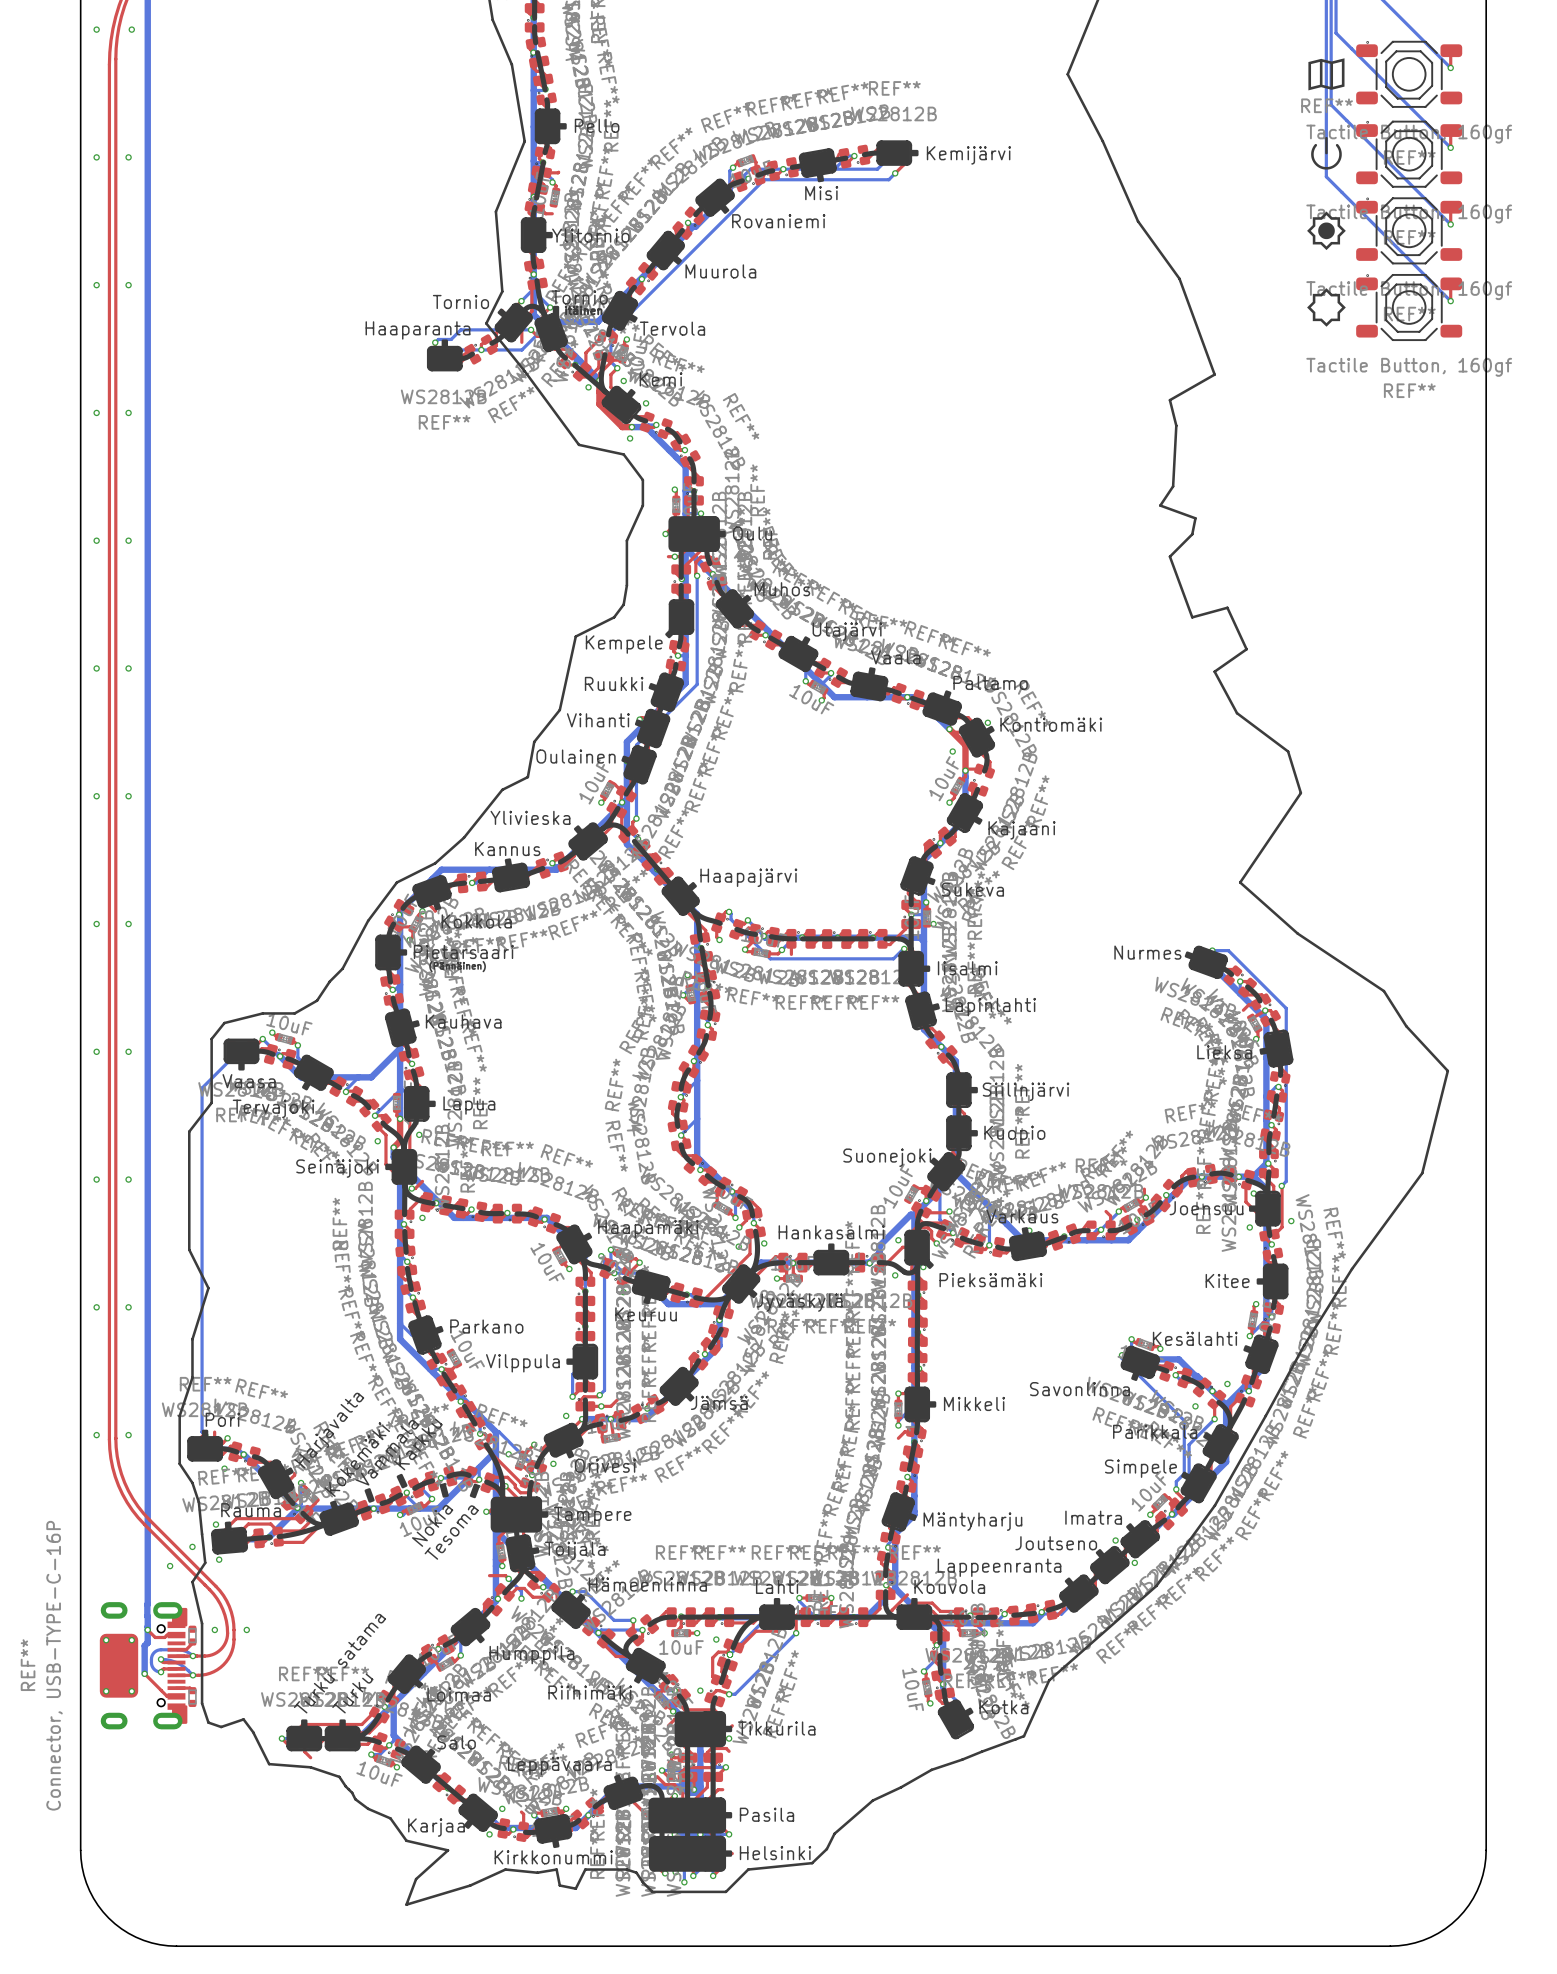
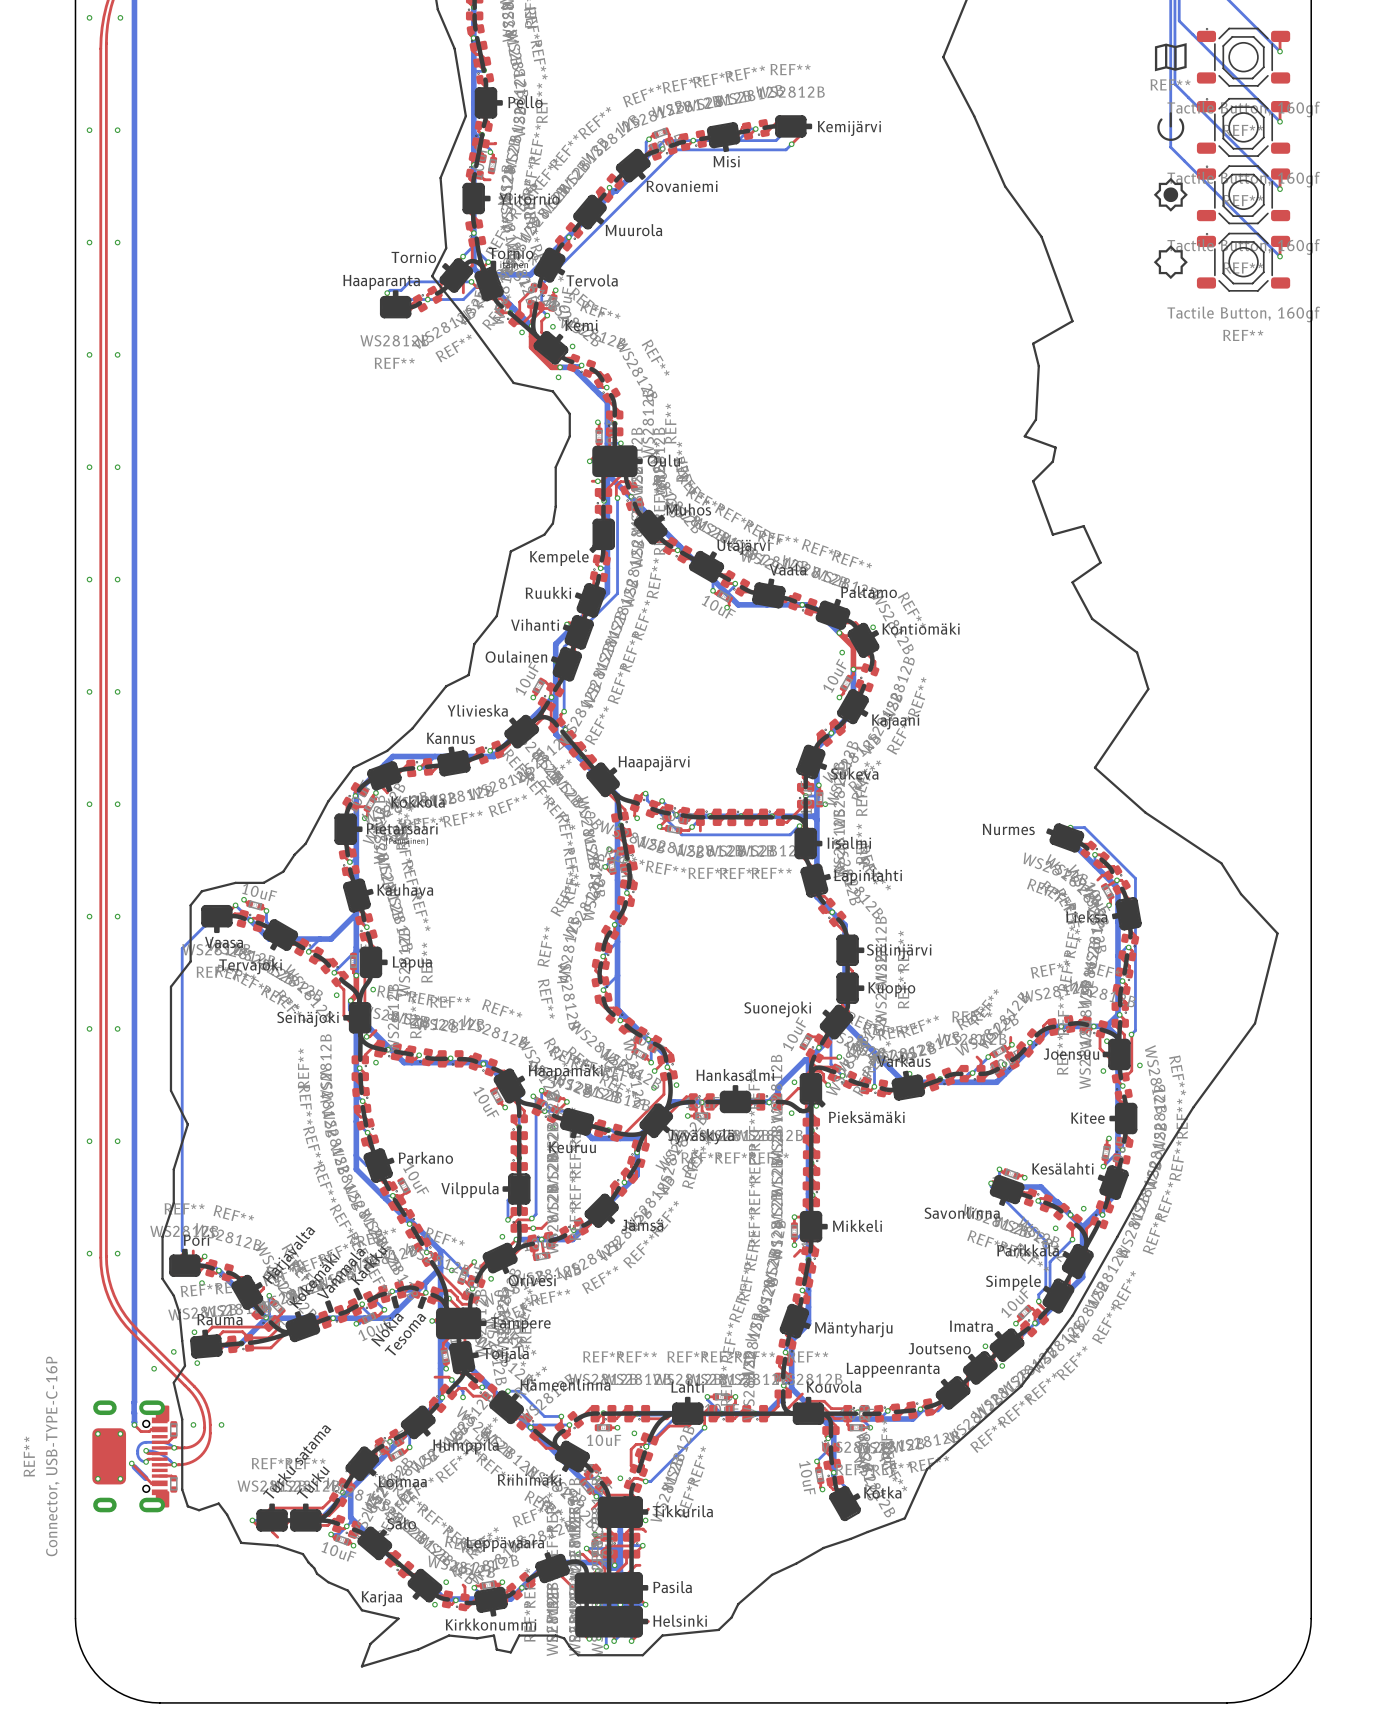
bottom track: (147, 1629) (147, 1642) (144, 1645) (144, 1673) -> none
bottom track: none -> (134, 1467) (145, 1478)

